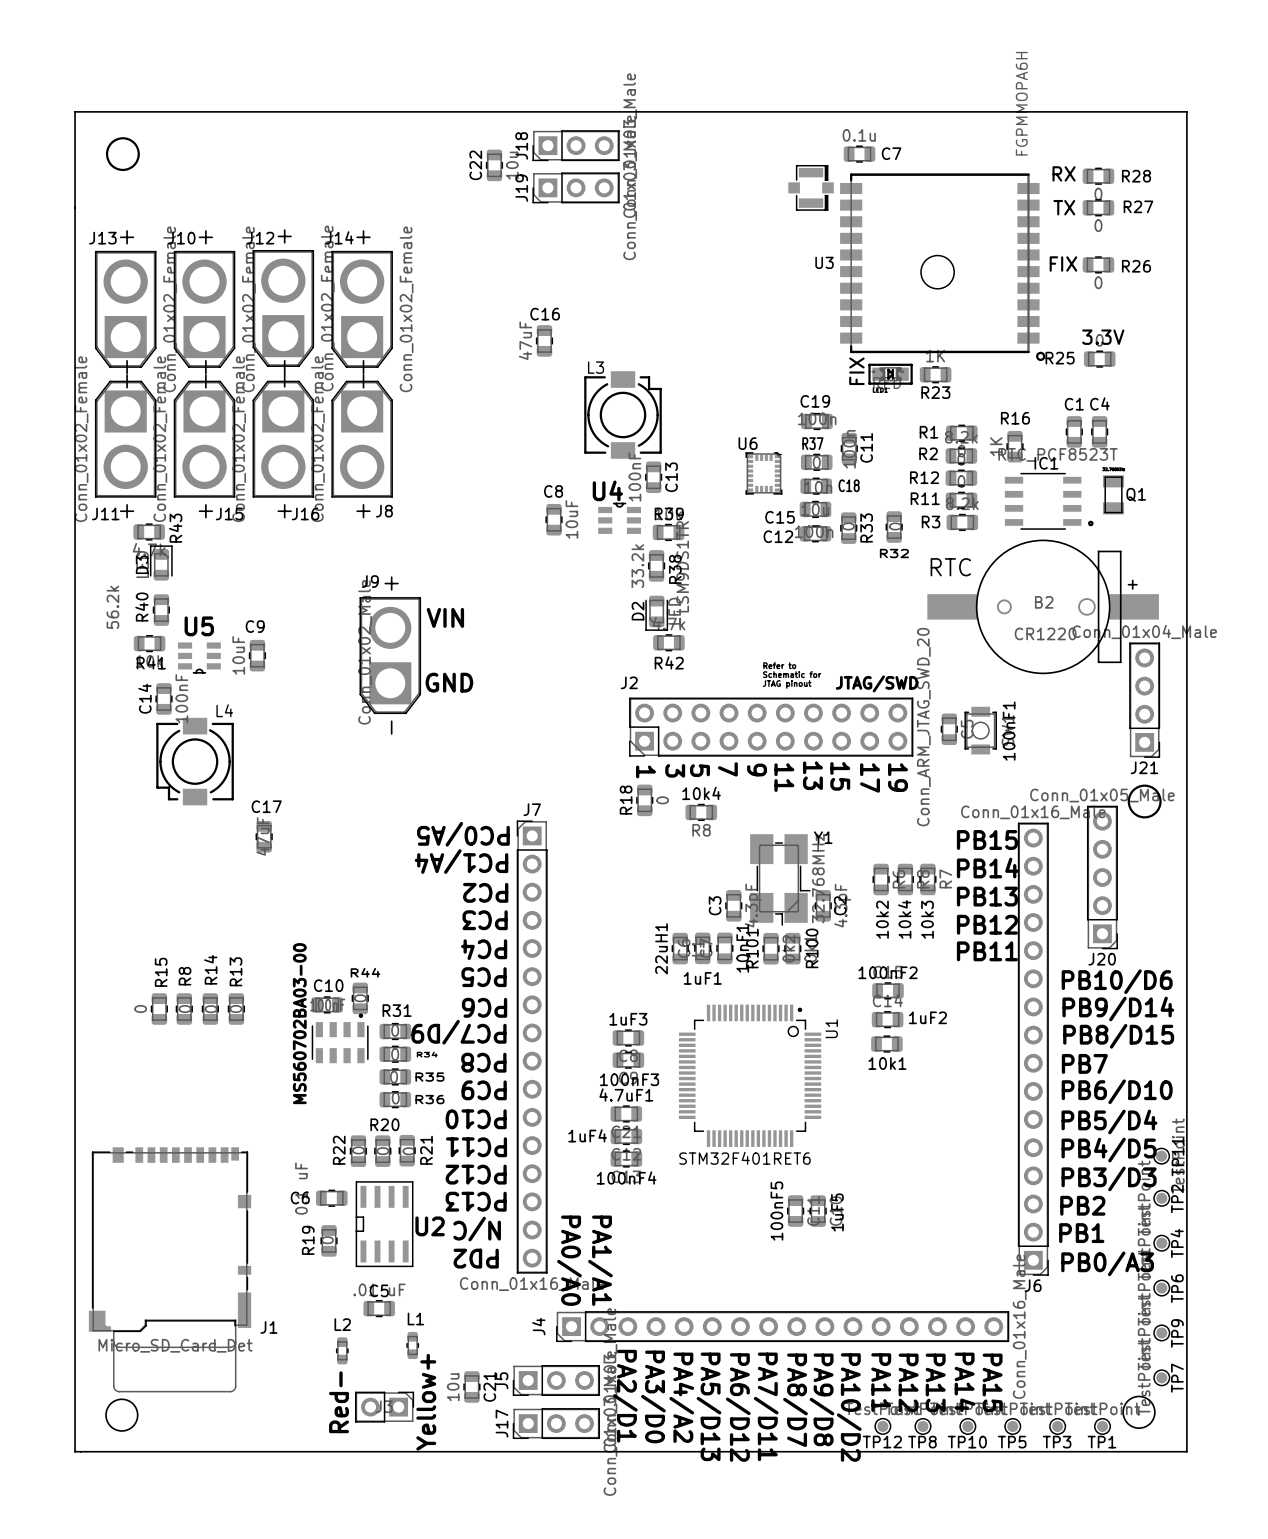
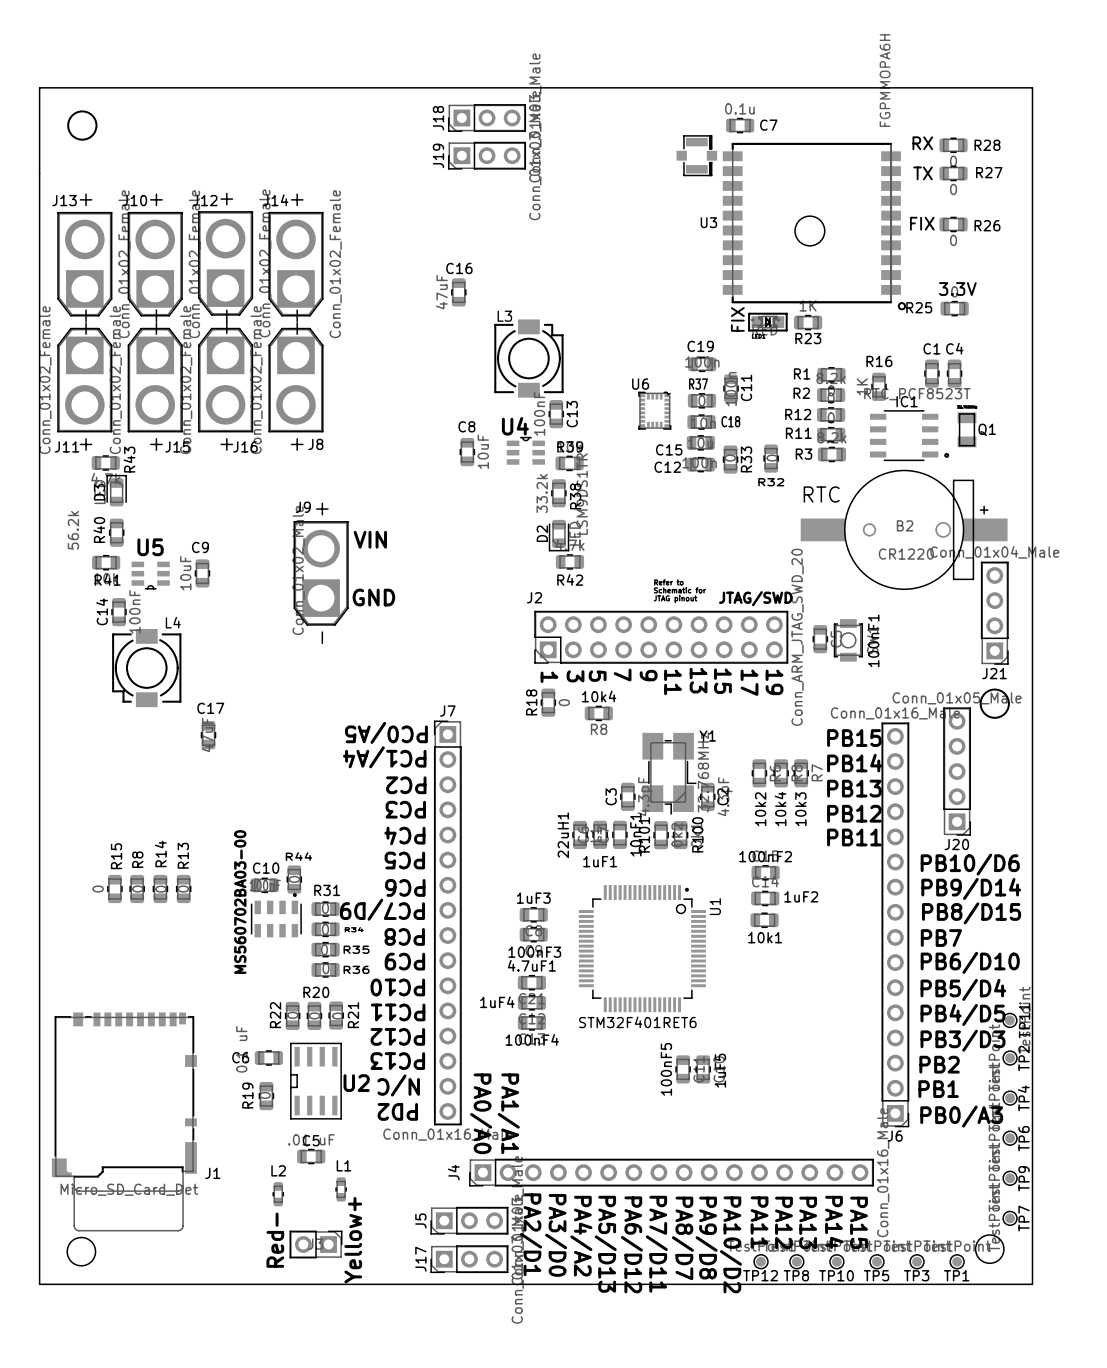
C22: 10u (494, 165) -> none
C21: 10u (471, 1386) -> none

